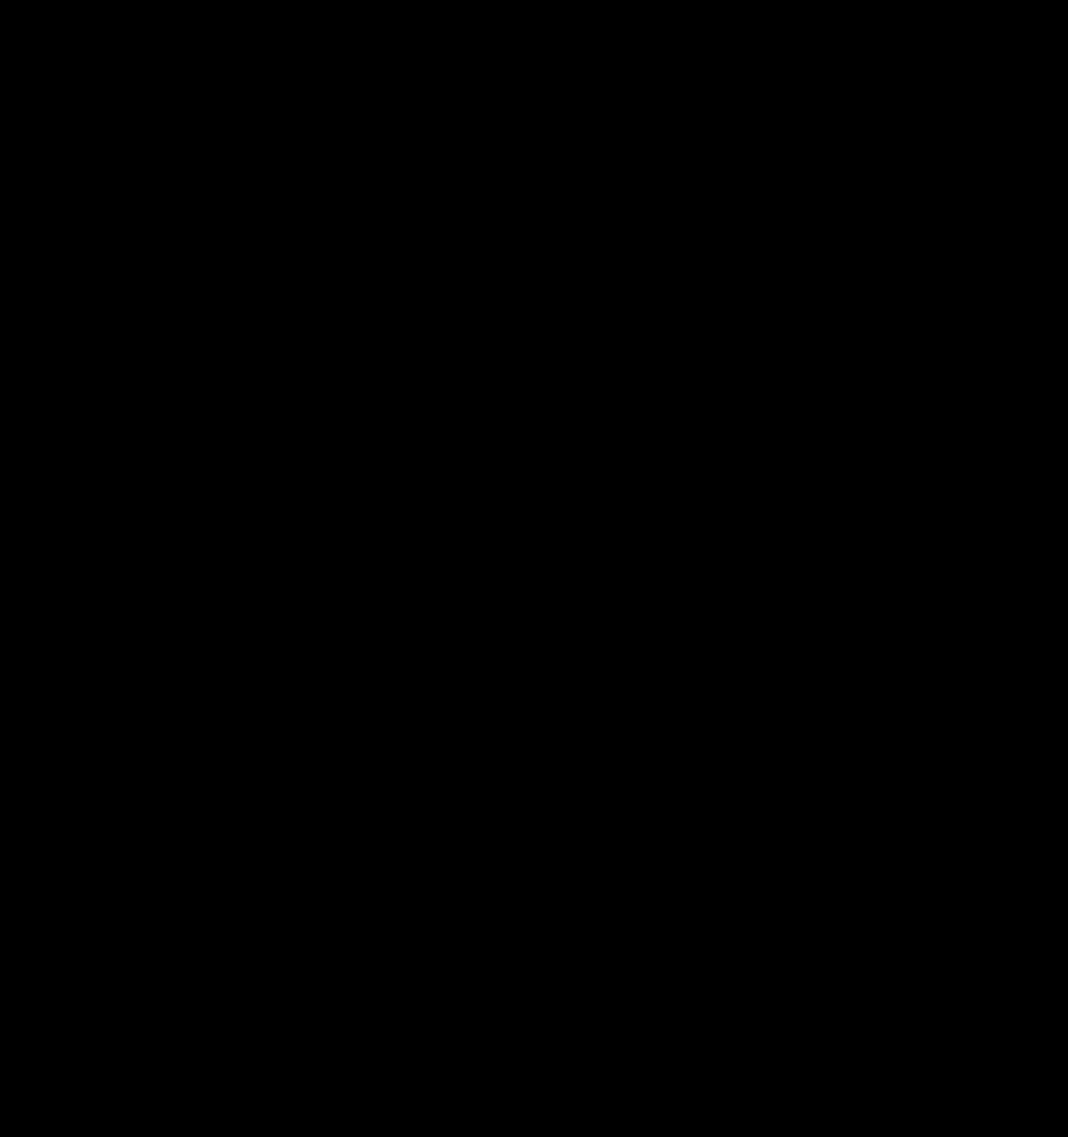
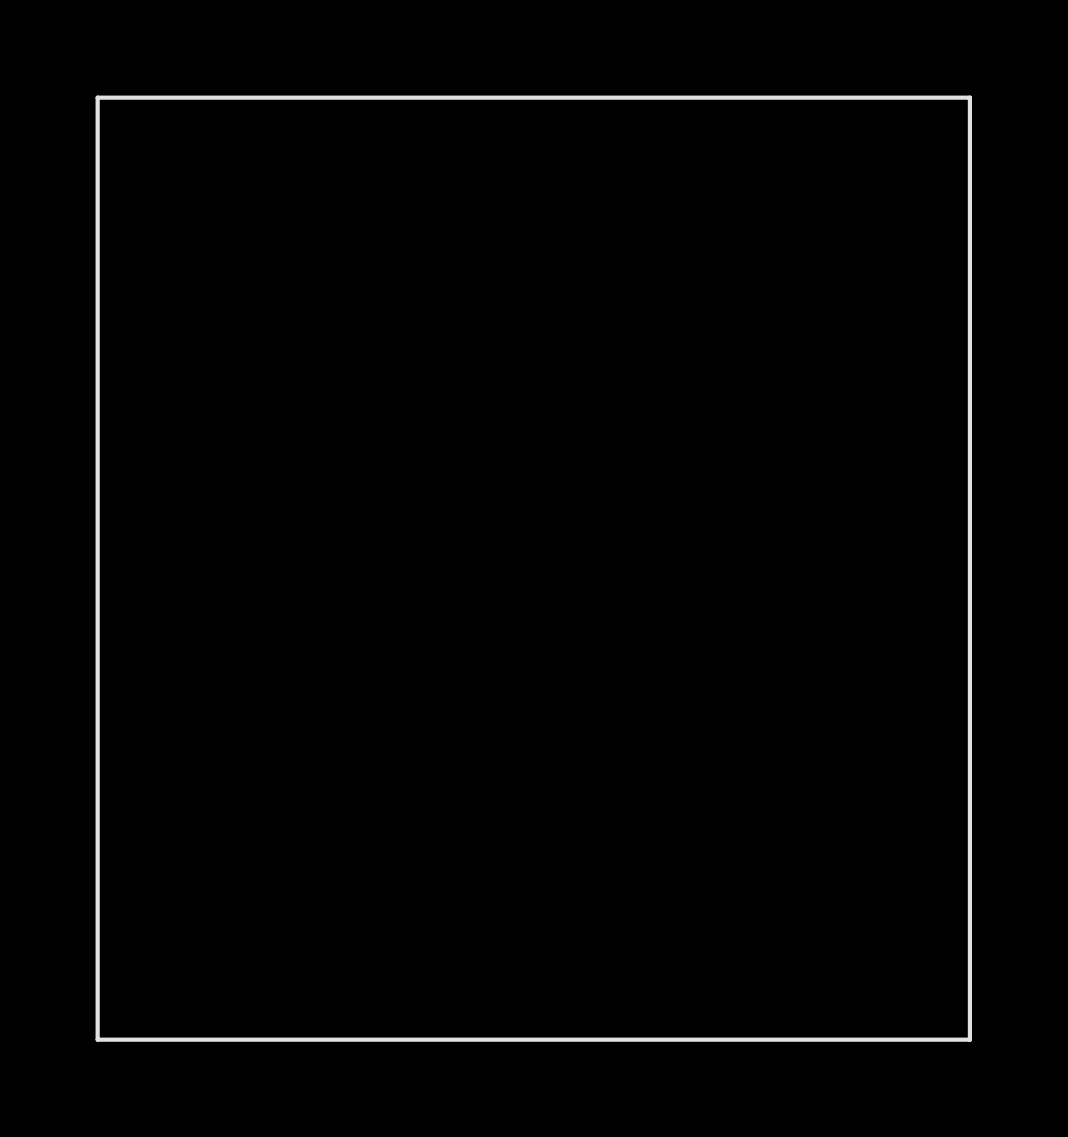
line: none -> (969, 97) (969, 1039) (97, 1039) (97, 97) (969, 97)

